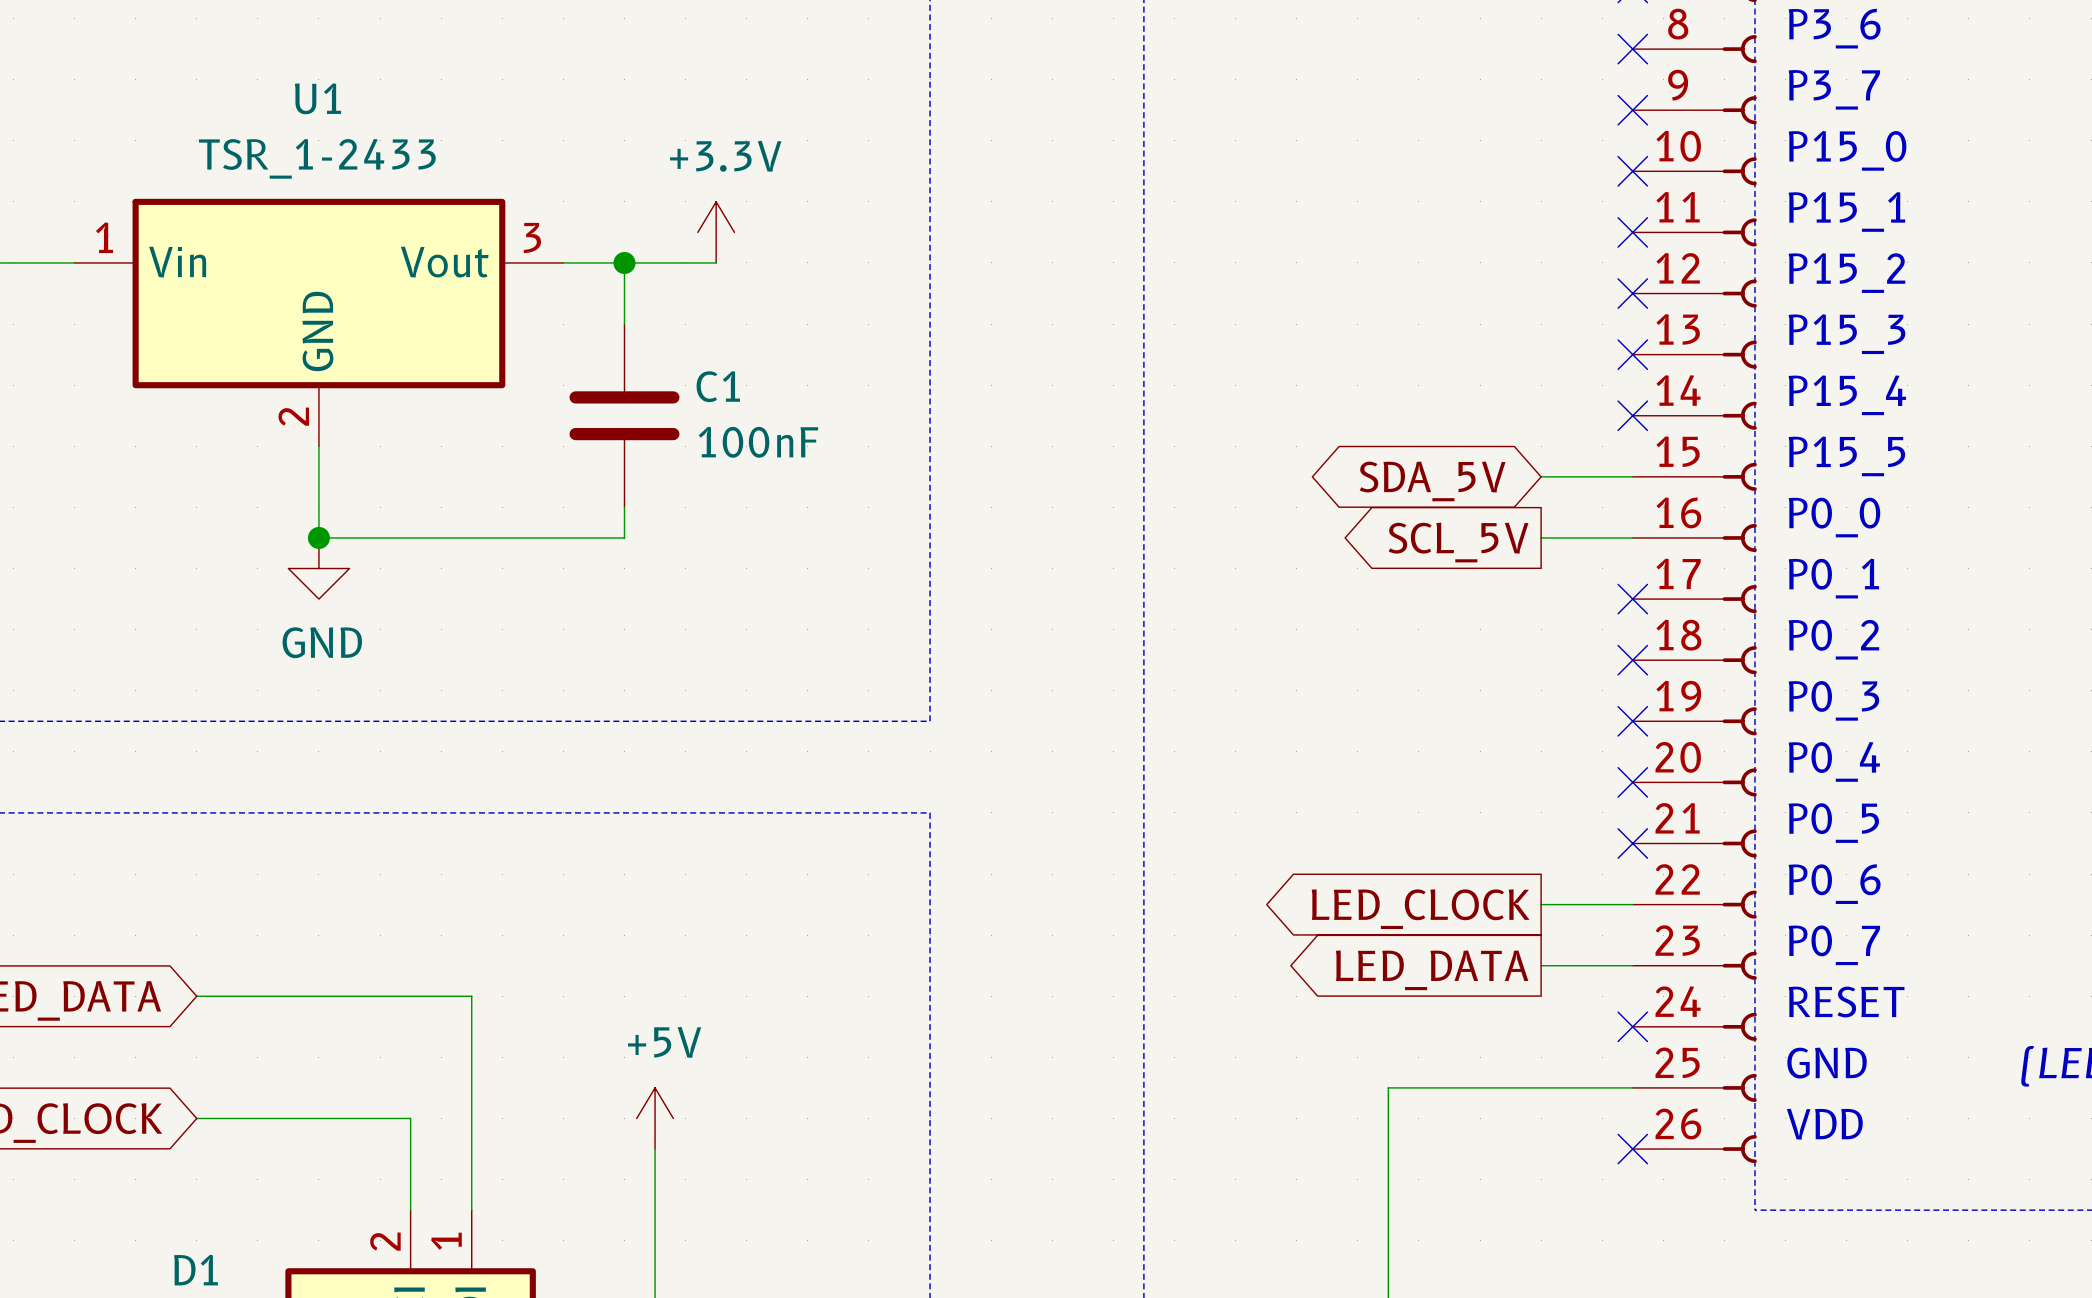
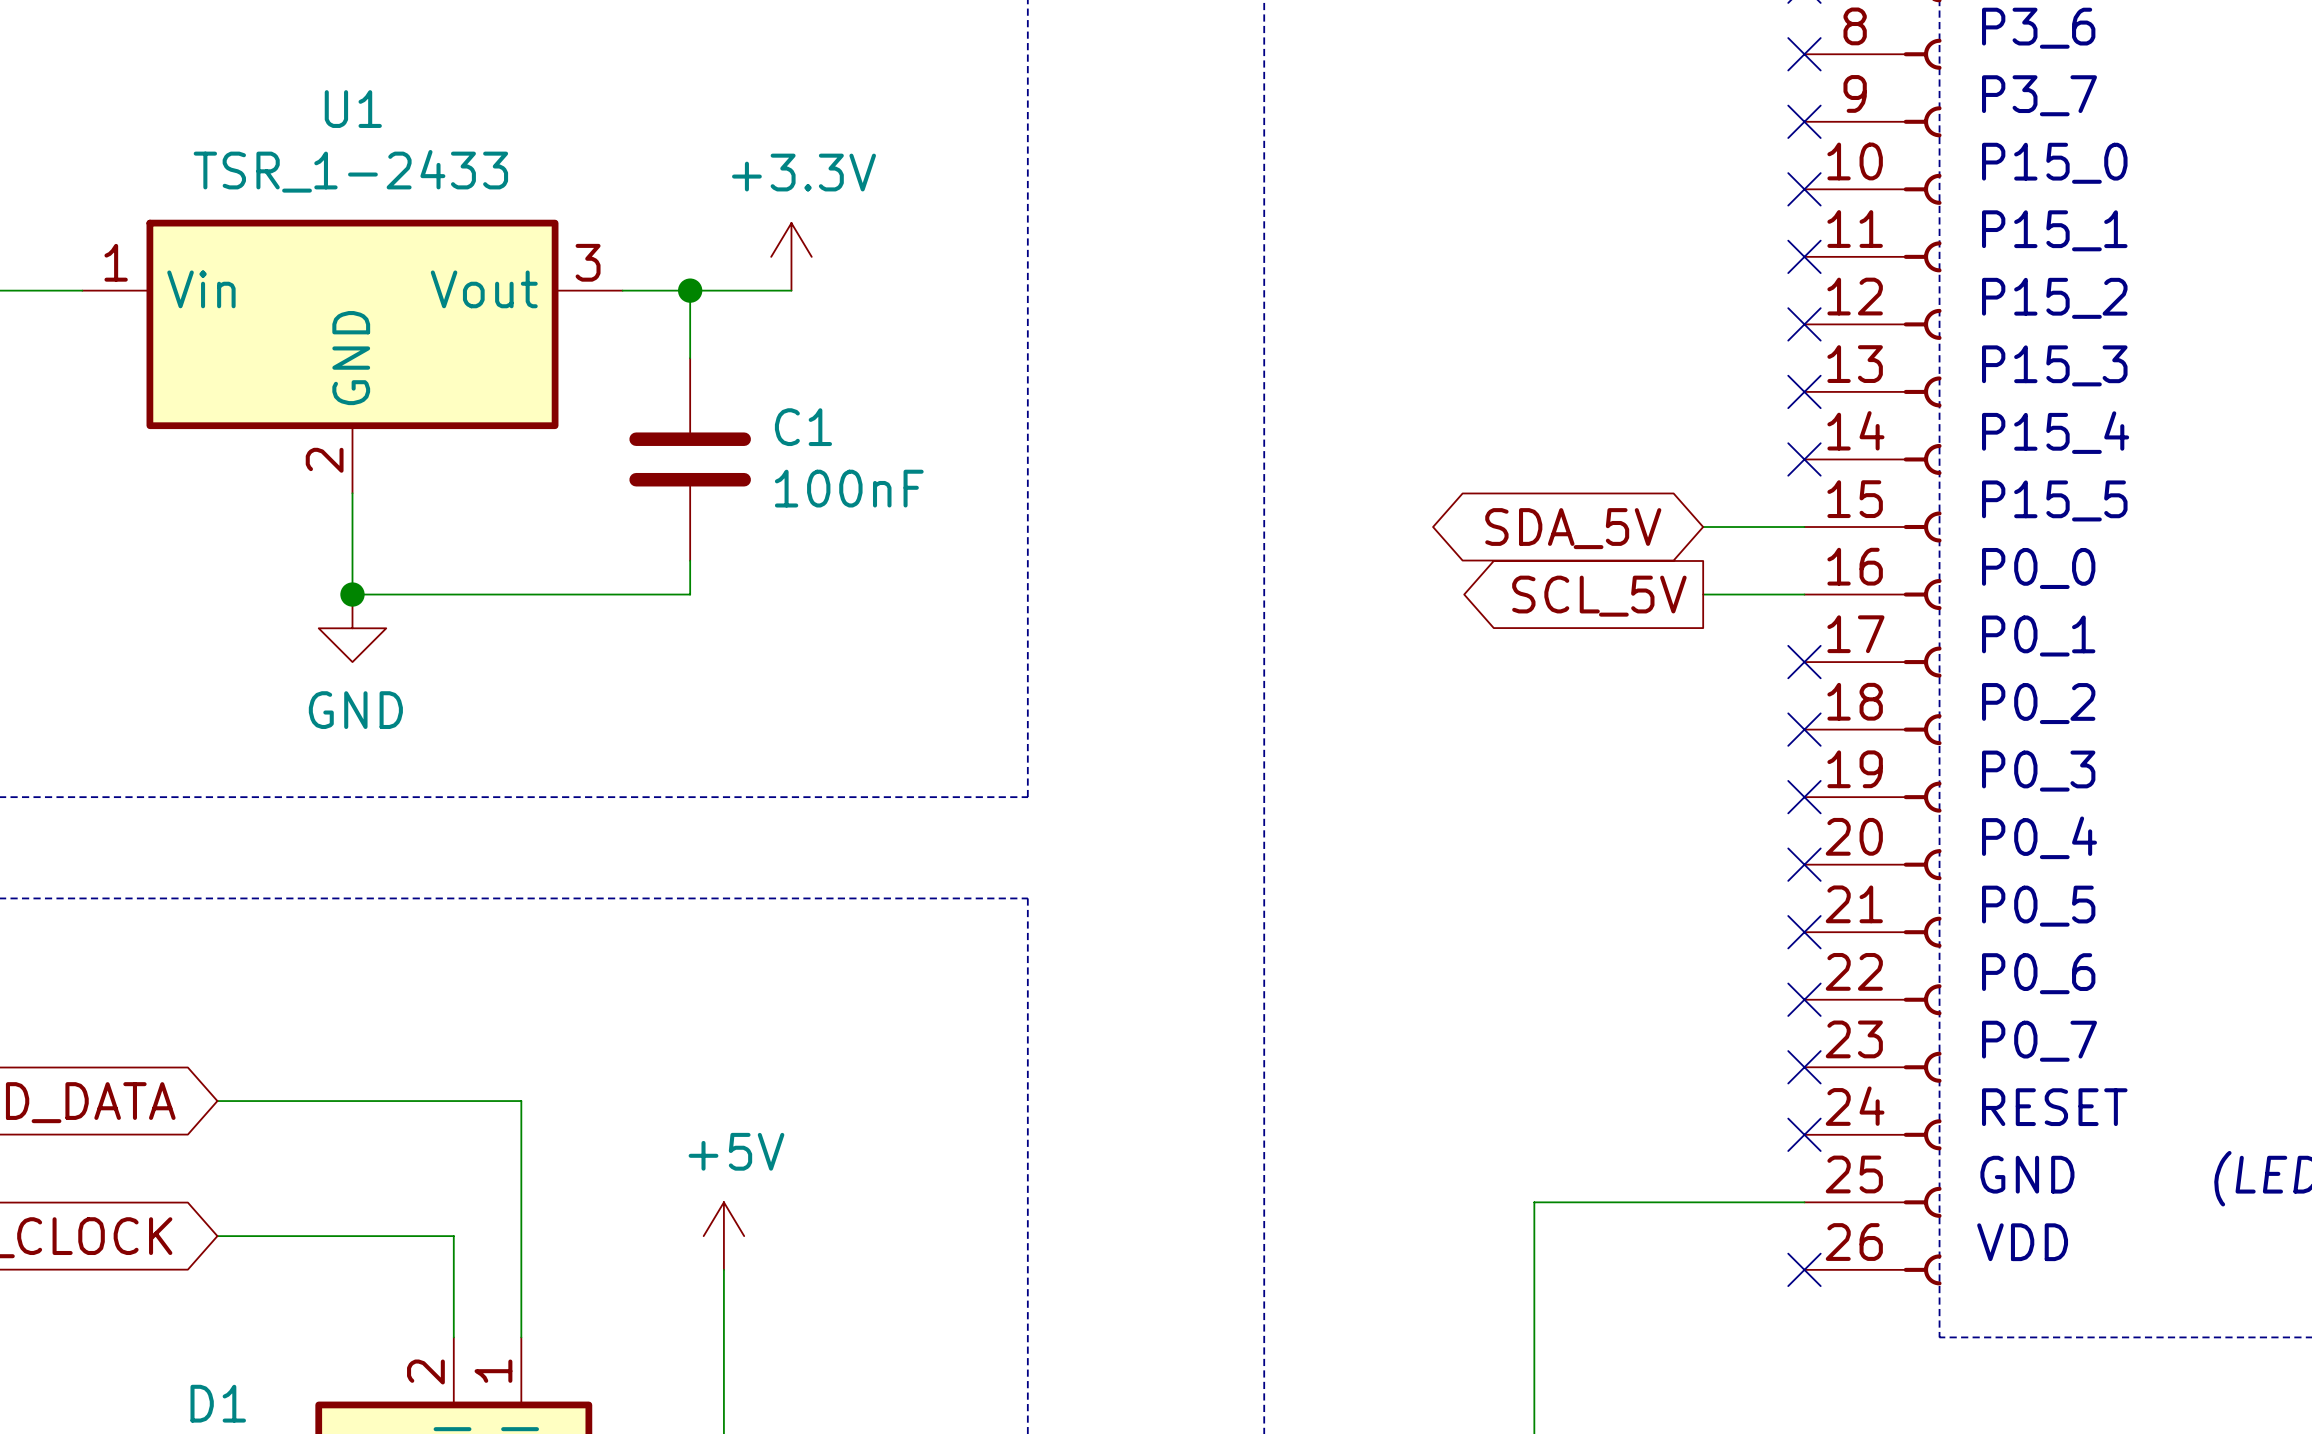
wire: (1541, 904) (1632, 904) -> none
no-connect mark: none -> (1804, 999)
global label: LED_CLOCK (1420, 909) -> none
wire: (1541, 965) (1632, 965) -> none
no-connect mark: none -> (1804, 1067)
global label: LED_DATA (1432, 970) -> none

